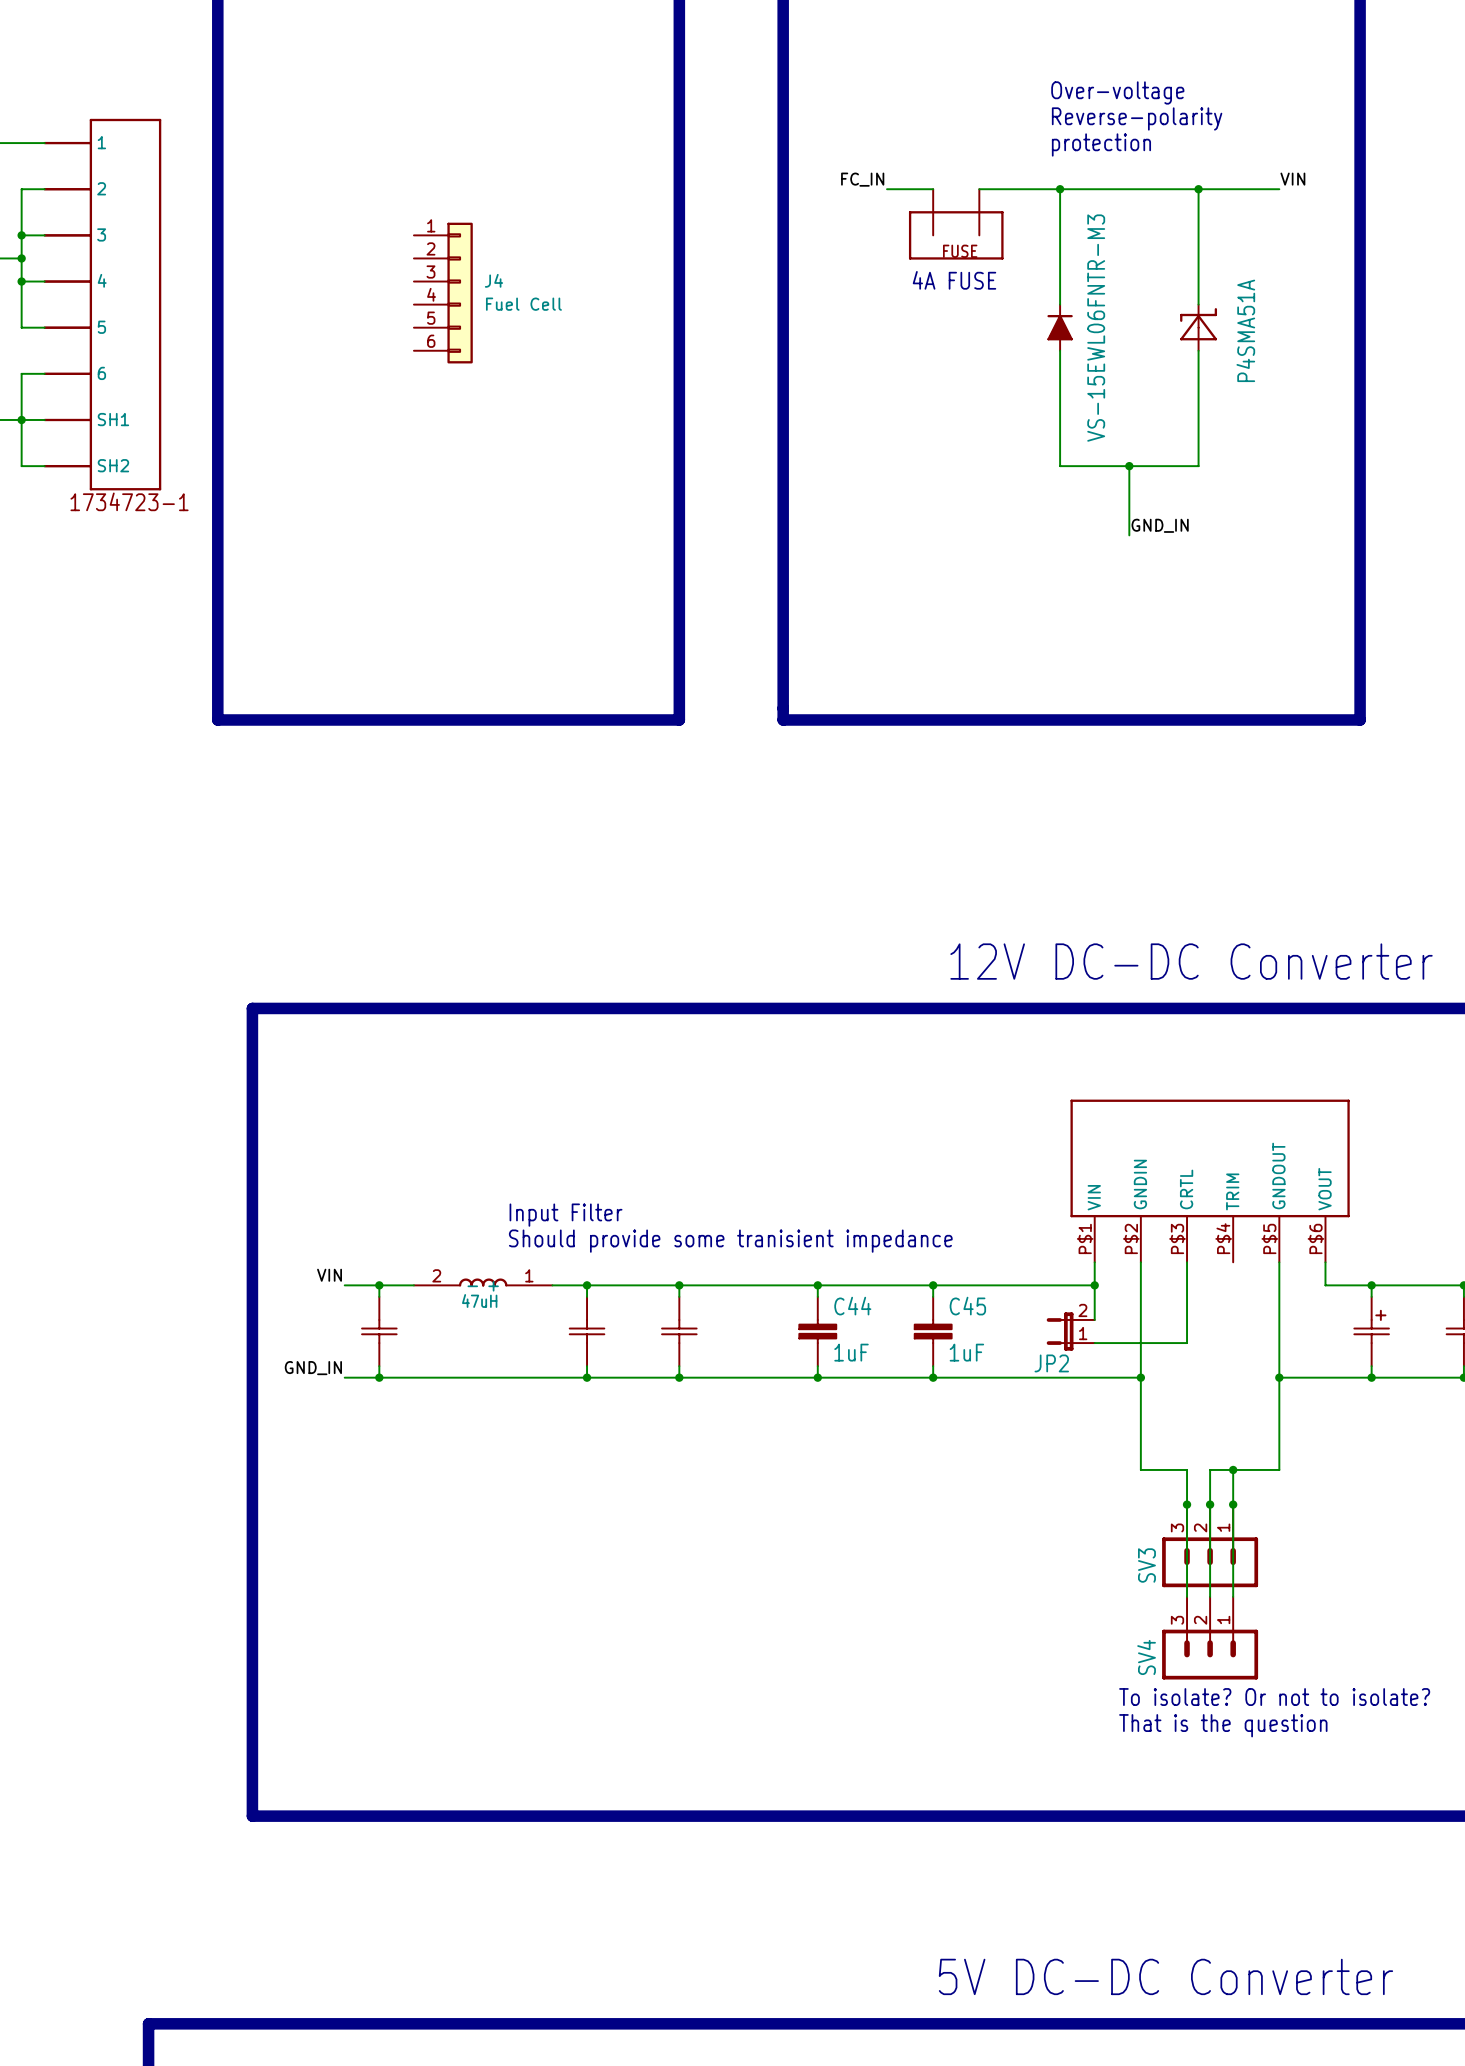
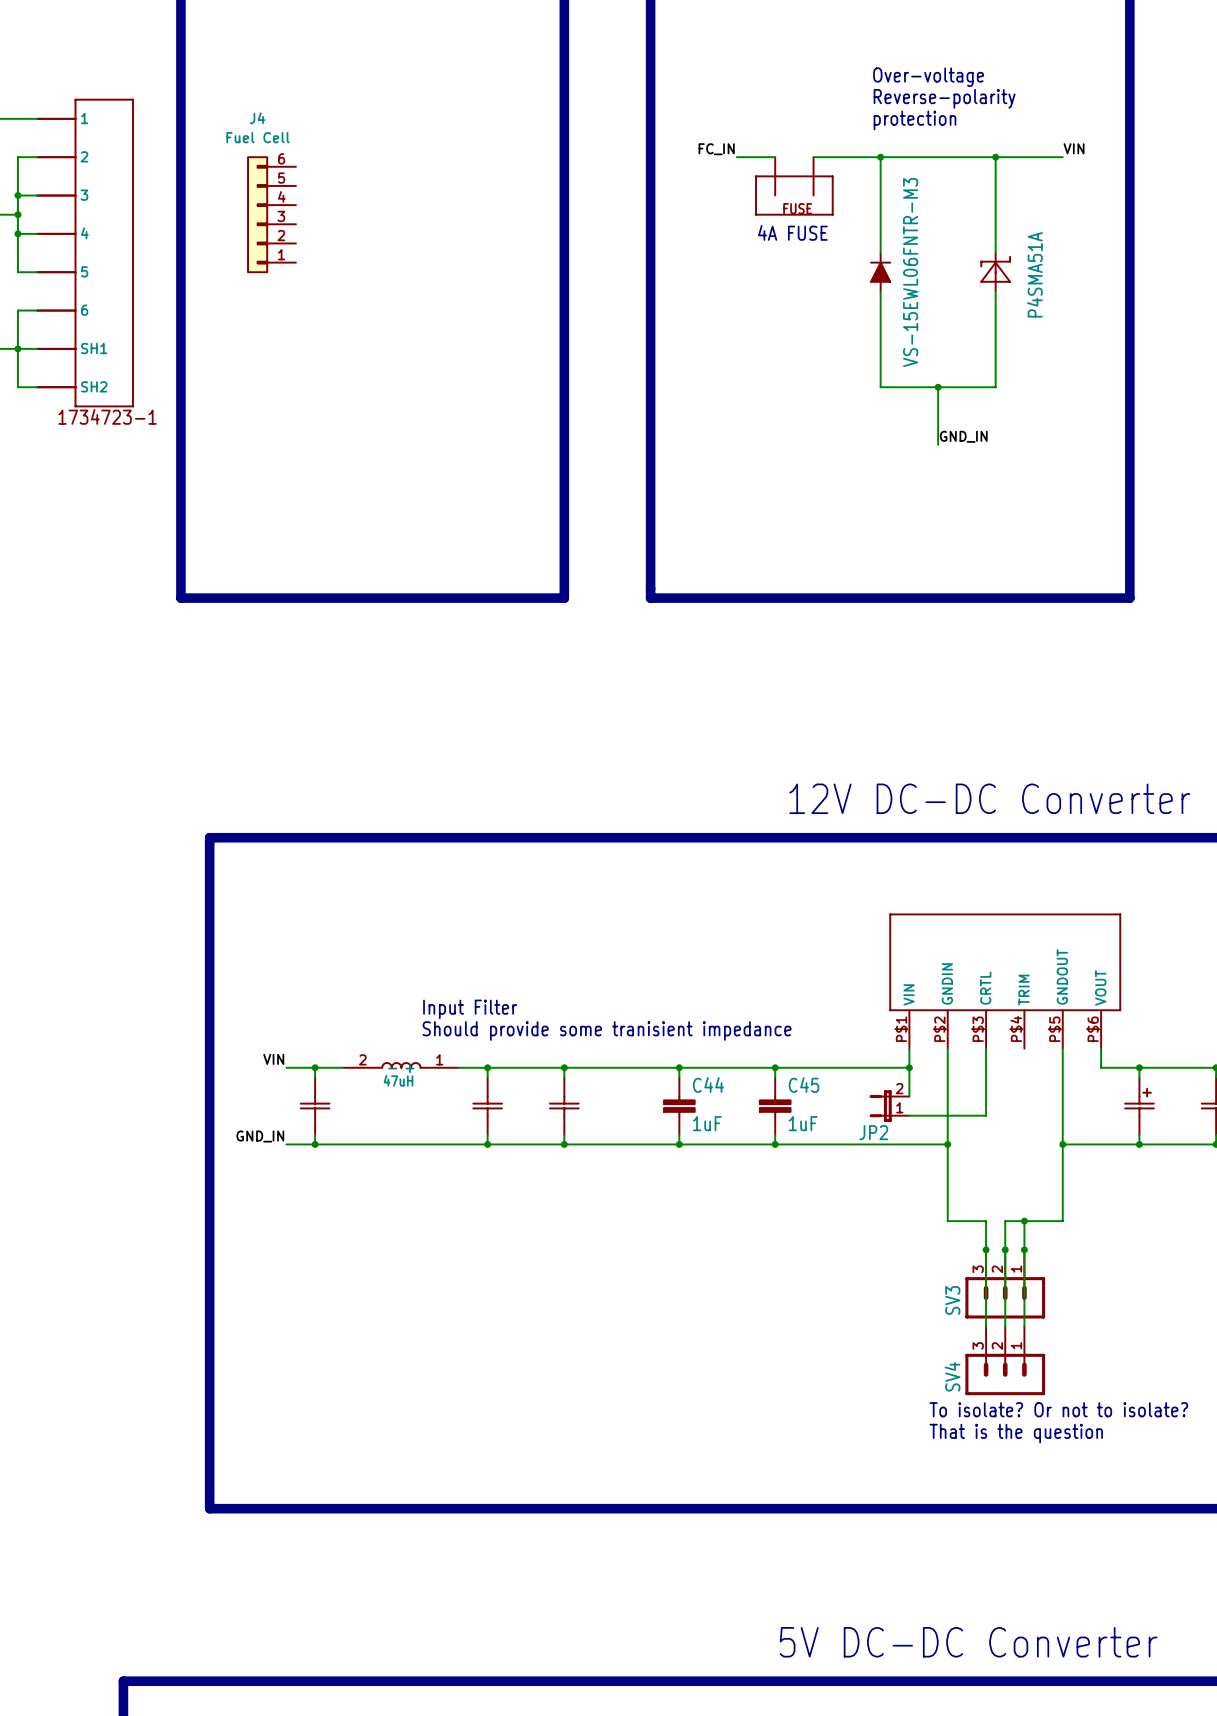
J4 name position: J4 (493, 280) -> J4 (257, 118)
J4 position: (443, 293) -> (271, 214)
J4 rotation: 0° (460, 293) -> 180° (257, 214)
J4 value position: Fuel Cell (523, 304) -> Fuel Cell (258, 137)

